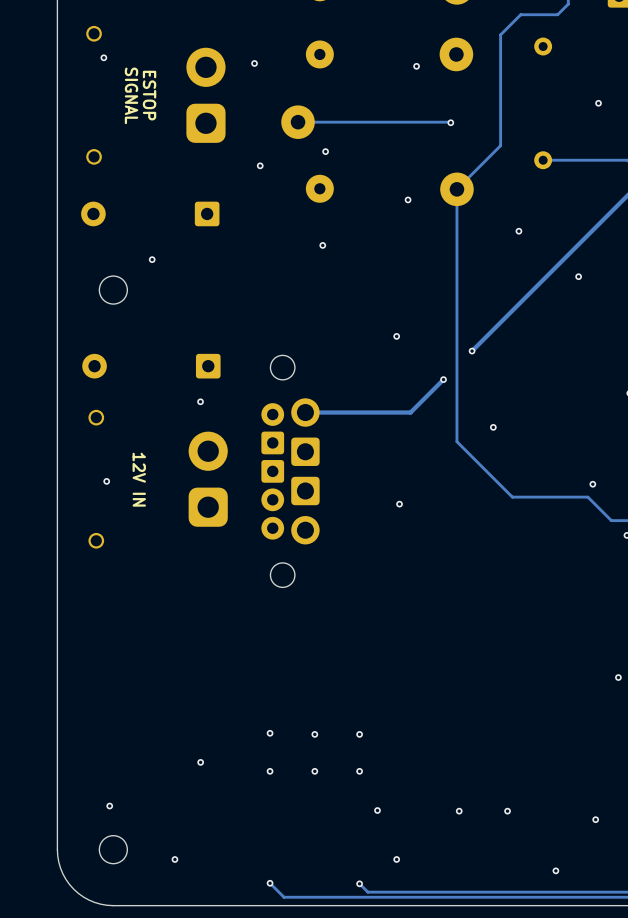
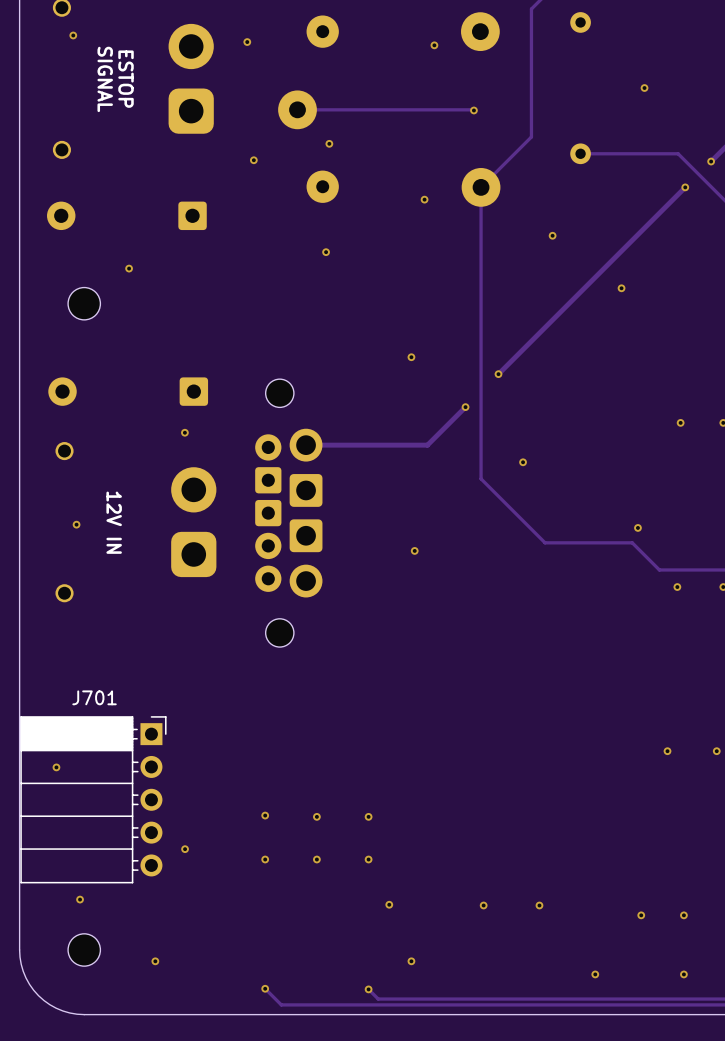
via: none -> (56, 767)
J701: none -> (93, 799)

